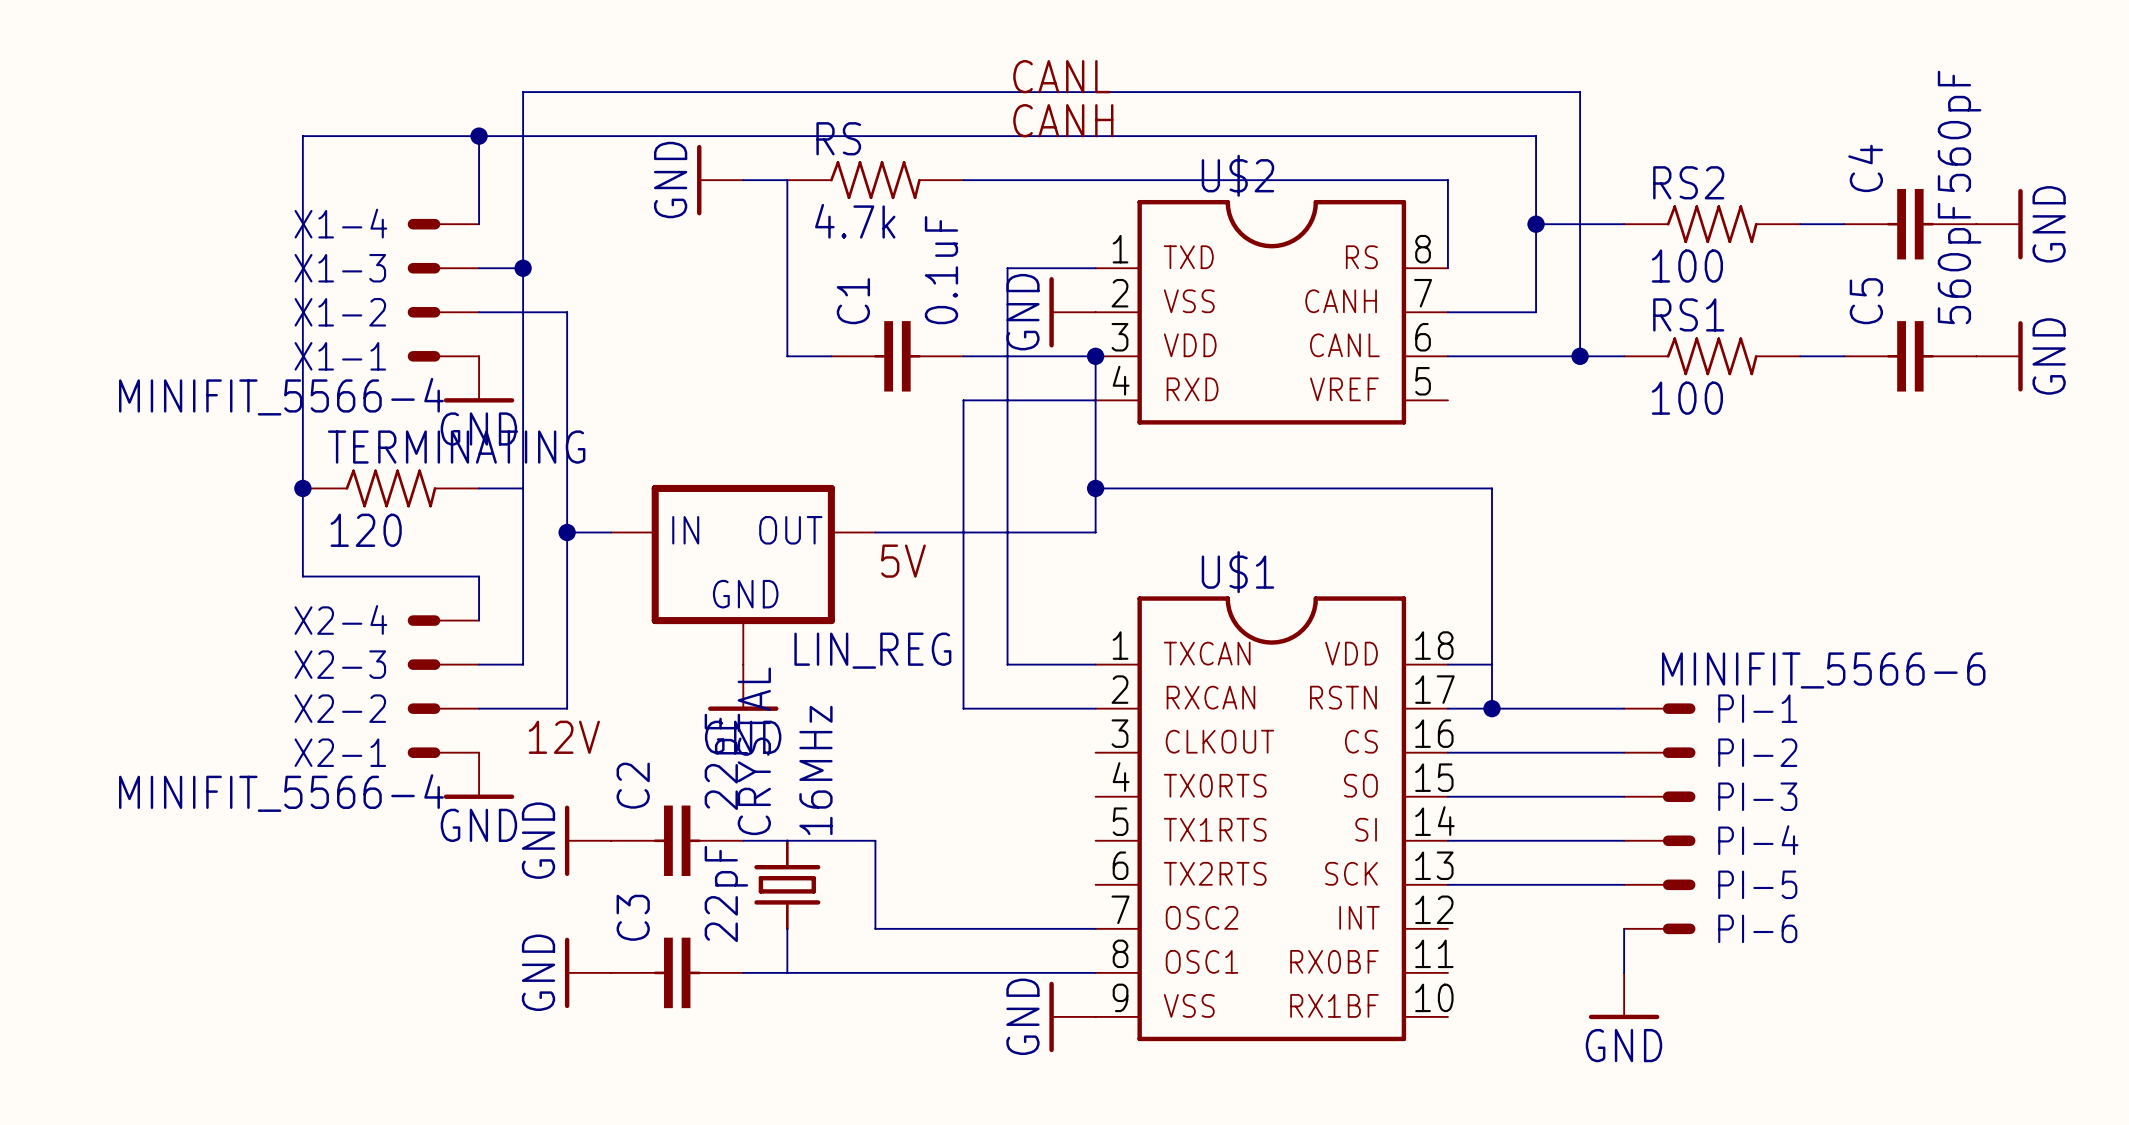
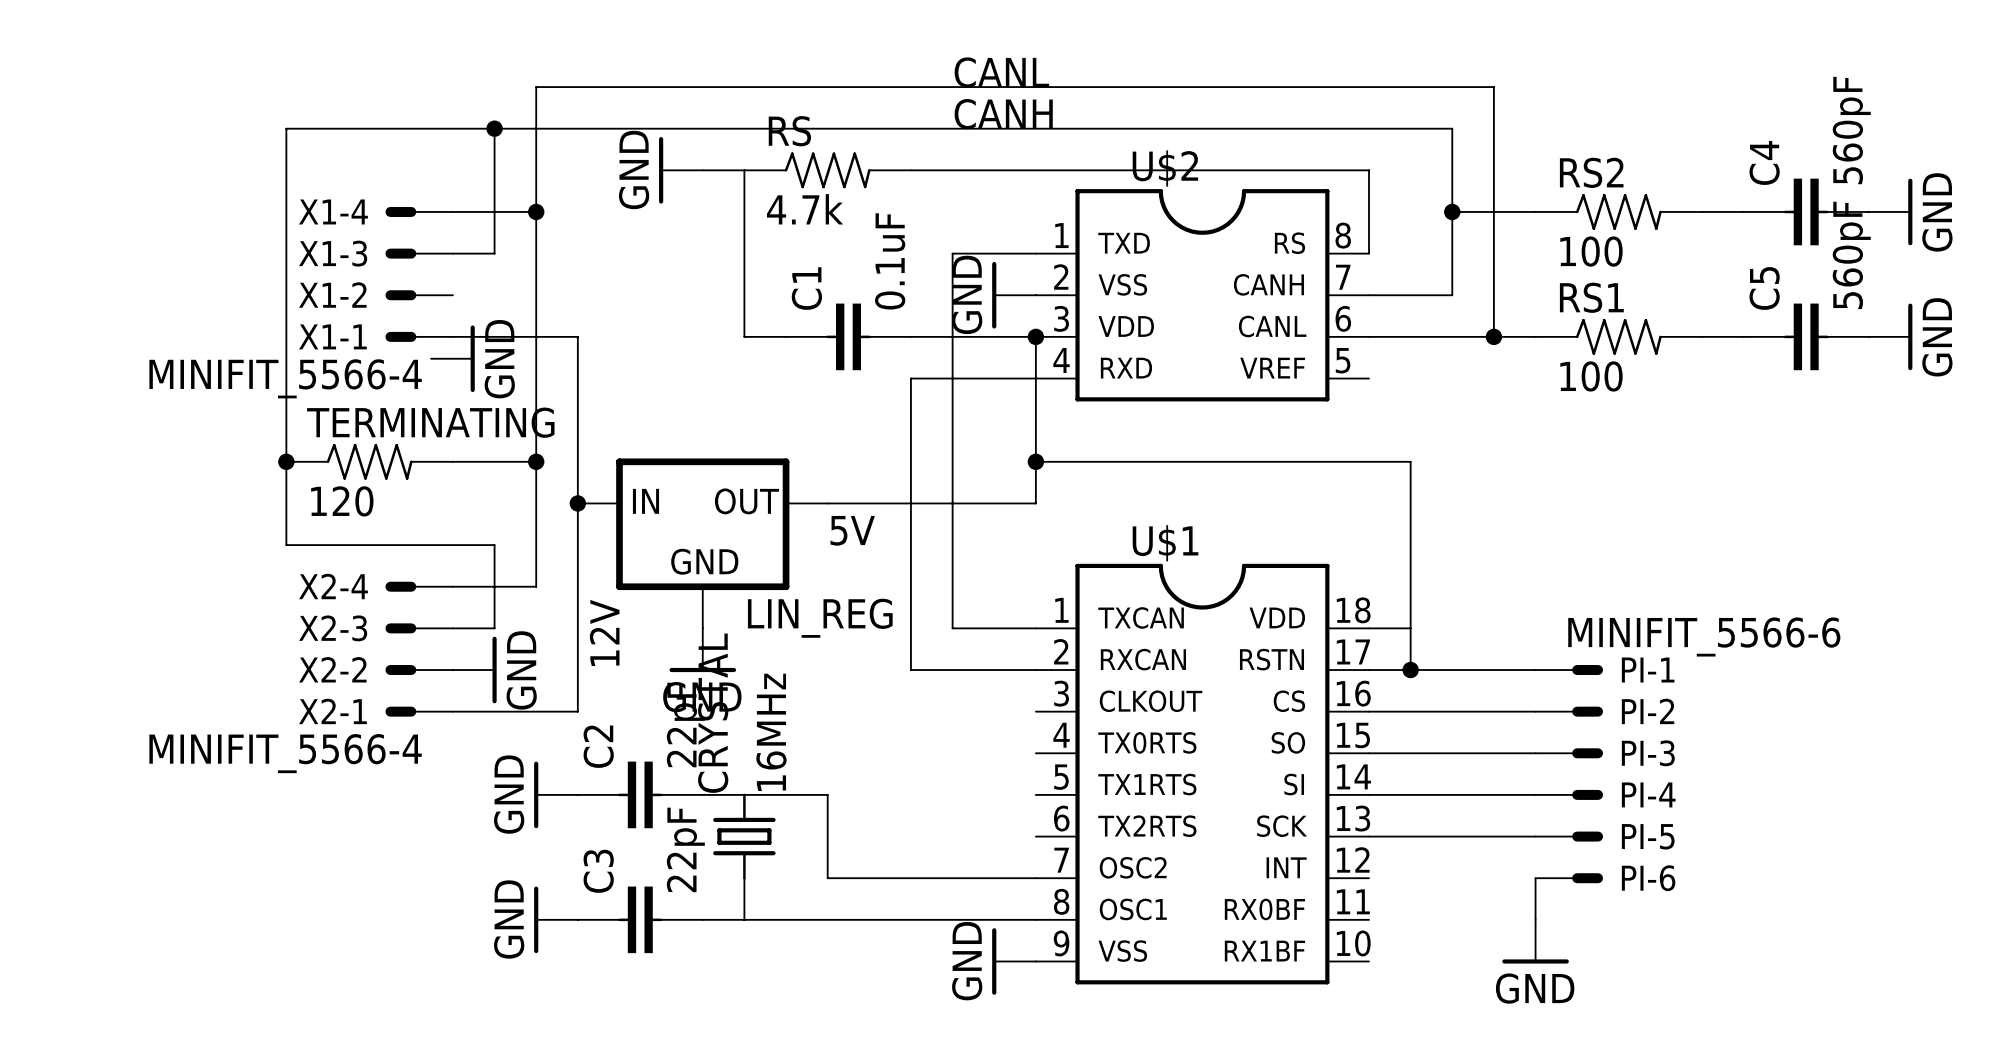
wire: (567, 92) (523, 92) (523, 136) -> (536, 87) (536, 295)
wire: (479, 136) (479, 224) -> (536, 211) (452, 211)
junction position: (479, 136) -> (494, 128)
junction: none -> (536, 211)
wire: (523, 268) (523, 576) -> none
junction: (523, 268) -> none
wire: (479, 312) (567, 312) -> none
wire: none -> (452, 336) (577, 336) (577, 711) (452, 711)
power symbol rotation: 0° (479, 400) -> 90° counterclockwise (472, 358)
junction: none -> (536, 461)
wire: (567, 532) (611, 532) -> (494, 461) (536, 461)
junction: (567, 532) -> none
junction: none -> (577, 503)
wire: (479, 576) (479, 620) -> (452, 545) (494, 545)
wire: (567, 620) (567, 708) (479, 708) -> (536, 586) (452, 586)
label rotation: 0° (564, 737) -> 90° counterclockwise (604, 632)
label position: 12V (564, 737) -> 12V (604, 632)
power symbol position: GND (479, 775) -> GND (474, 670)
power symbol rotation: 0° (479, 796) -> 90° counterclockwise (494, 670)

